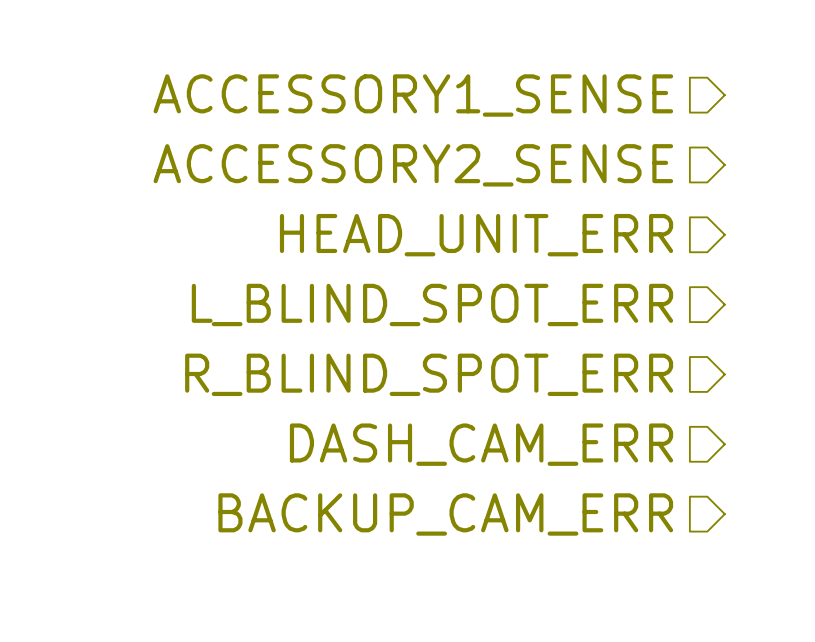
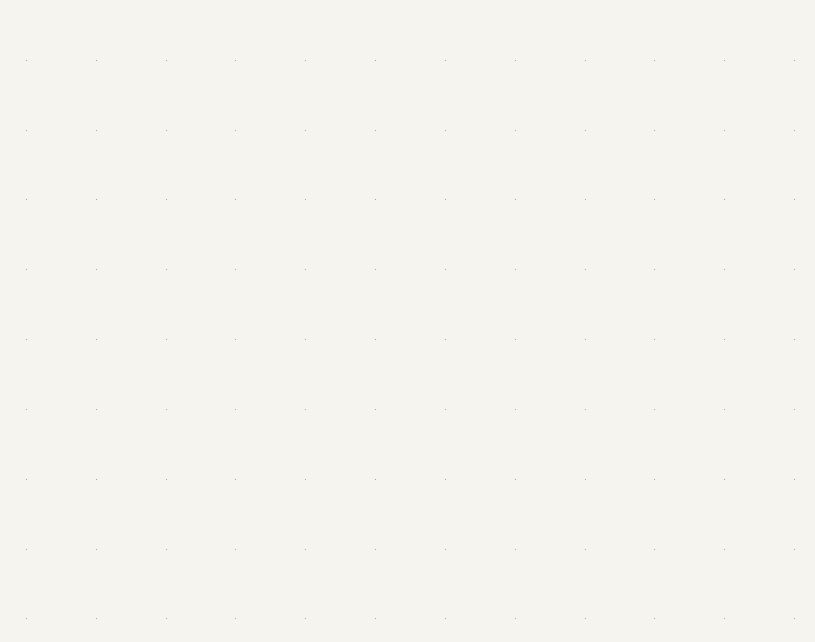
hierarchical label: ACCESSORY1_SENSE (413, 95) -> none
hierarchical label: ACCESSORY2_SENSE (413, 165) -> none
hierarchical label: HEAD_UNIT_ERR (476, 235) -> none
hierarchical label: L_BLIND_SPOT_ERR (432, 304) -> none
hierarchical label: R_BLIND_SPOT_ERR (429, 374) -> none
hierarchical label: DASH_CAM_ERR (481, 444) -> none
hierarchical label: BACKUP_CAM_ERR (445, 514) -> none

